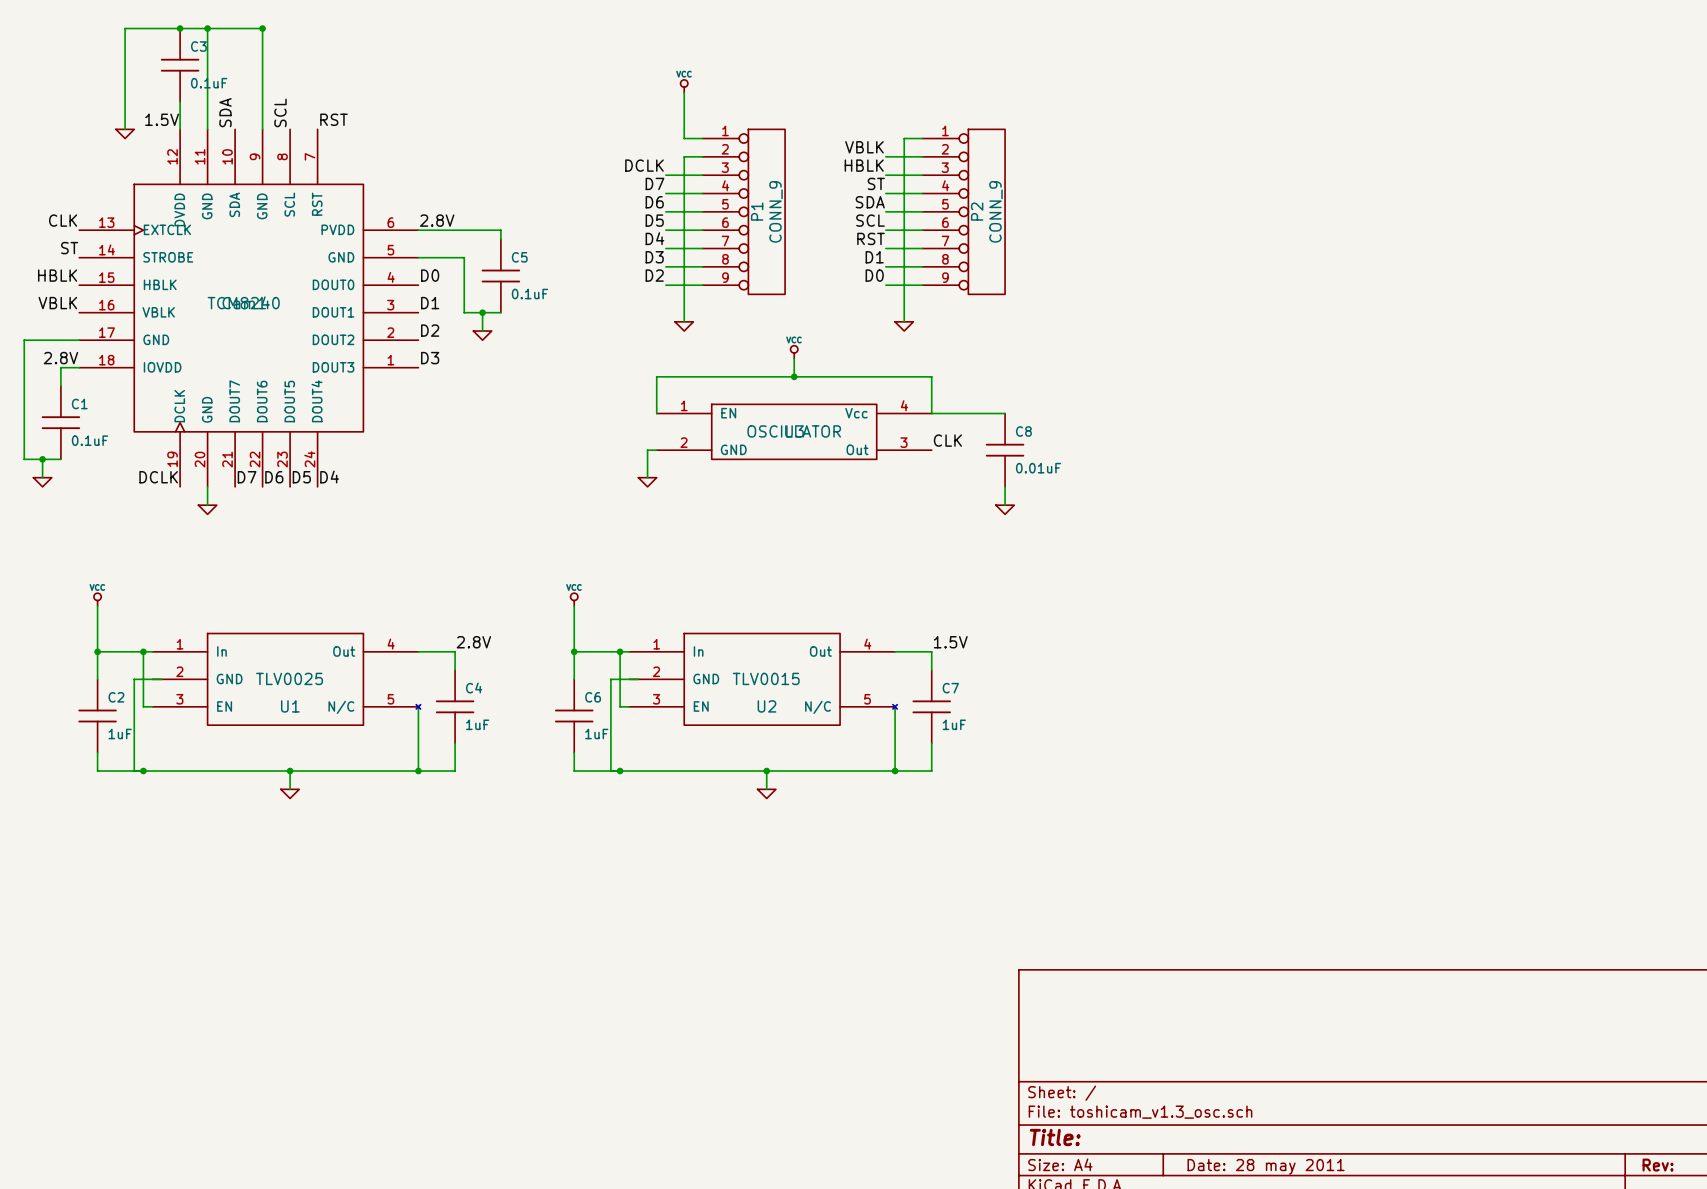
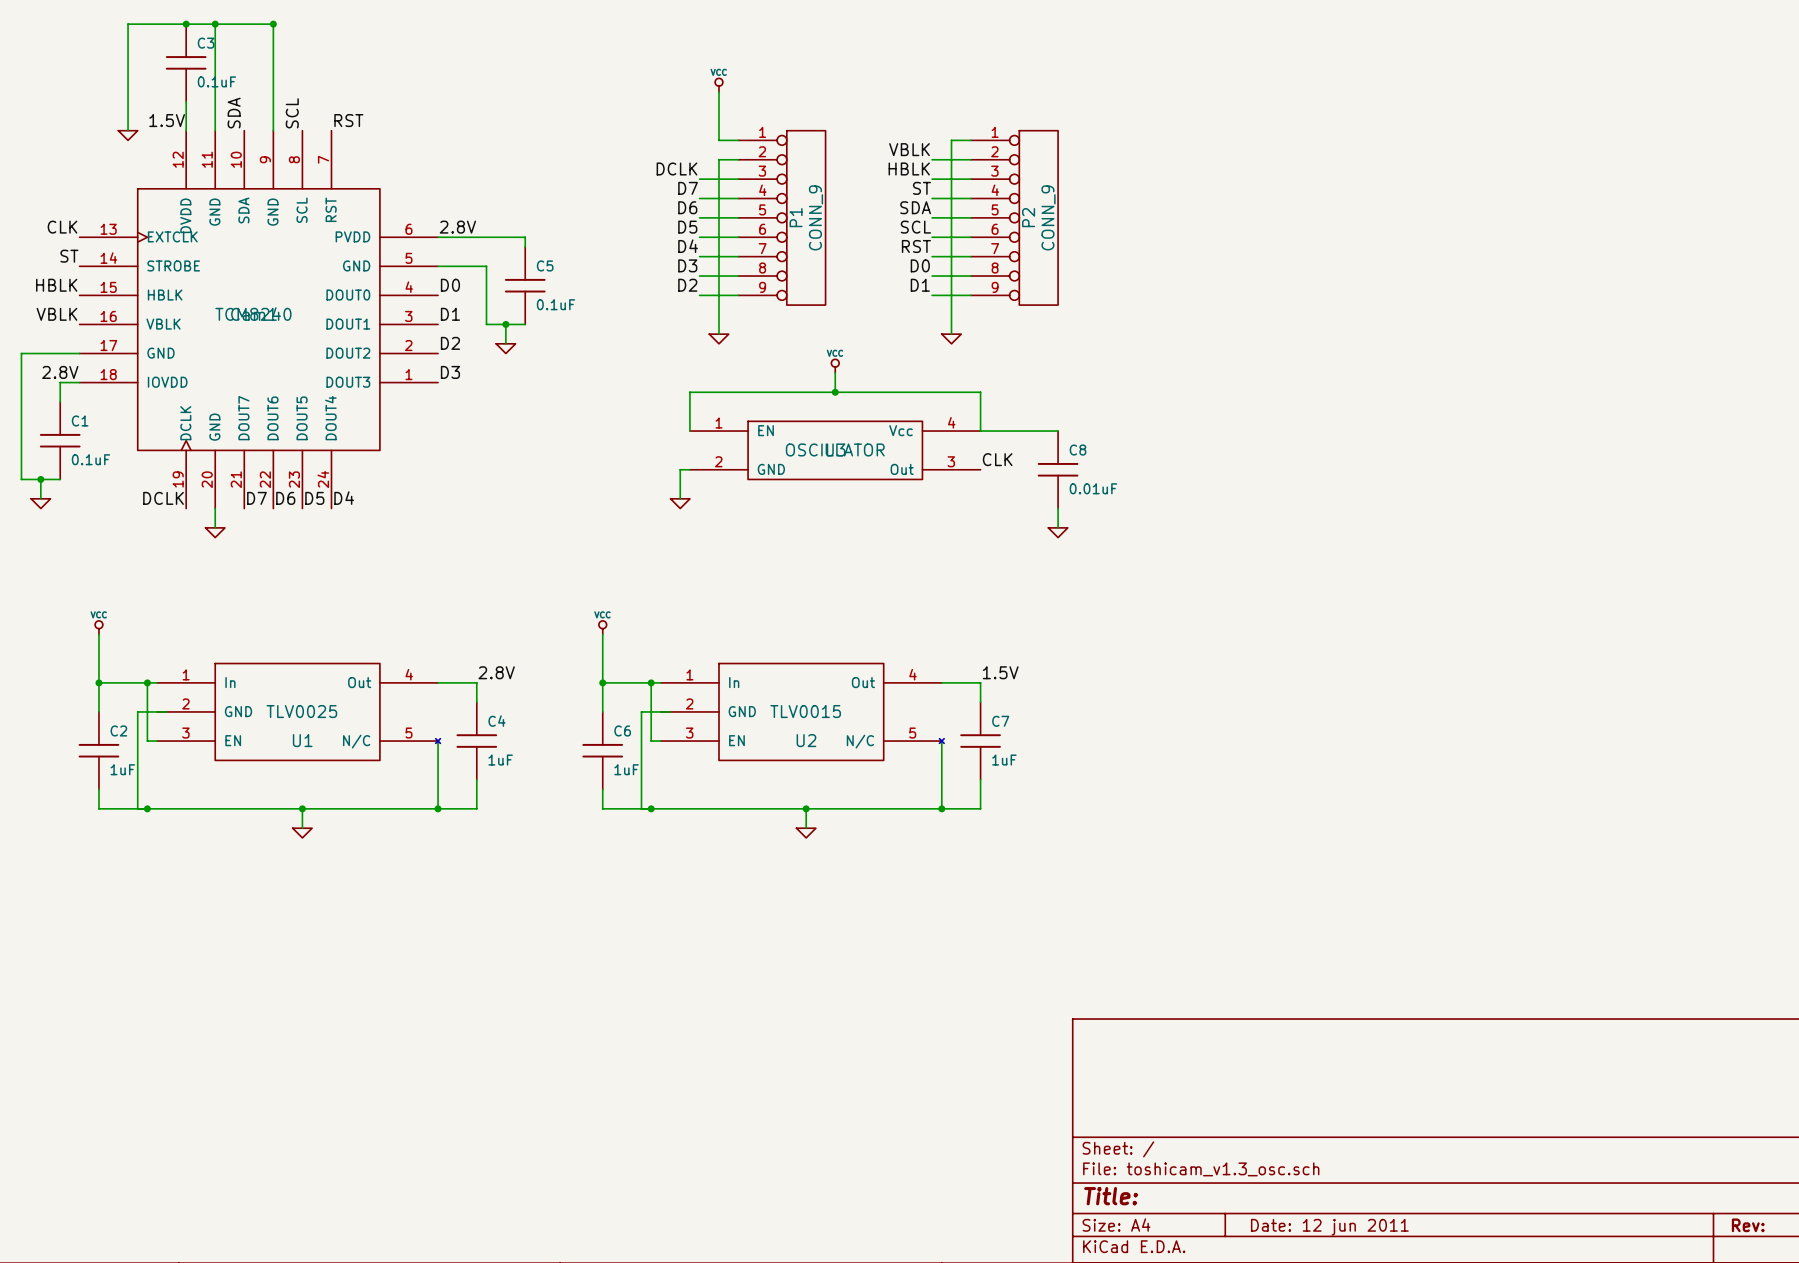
label: D1 (874, 257) -> D0 (920, 265)
label: D0 (874, 275) -> D1 (920, 285)
title block: Date: 28 may 2011 (1266, 1166) -> Date: 12 jun 2011 (1329, 1227)

